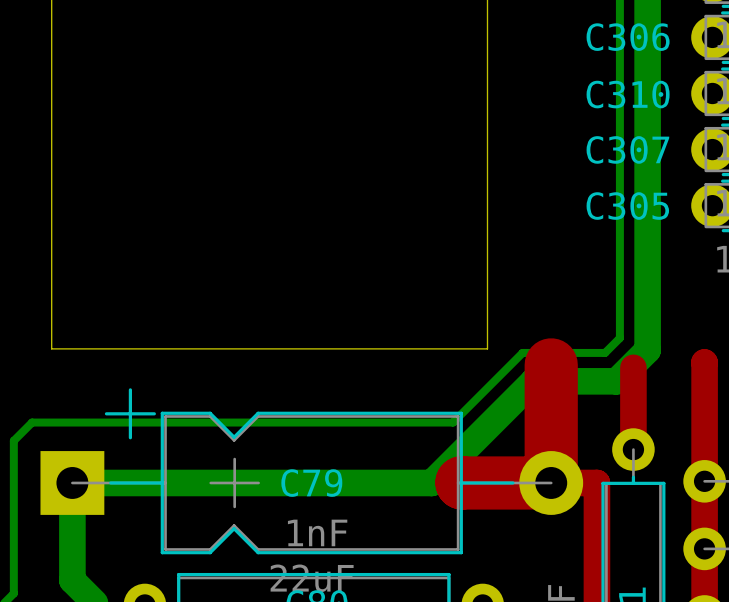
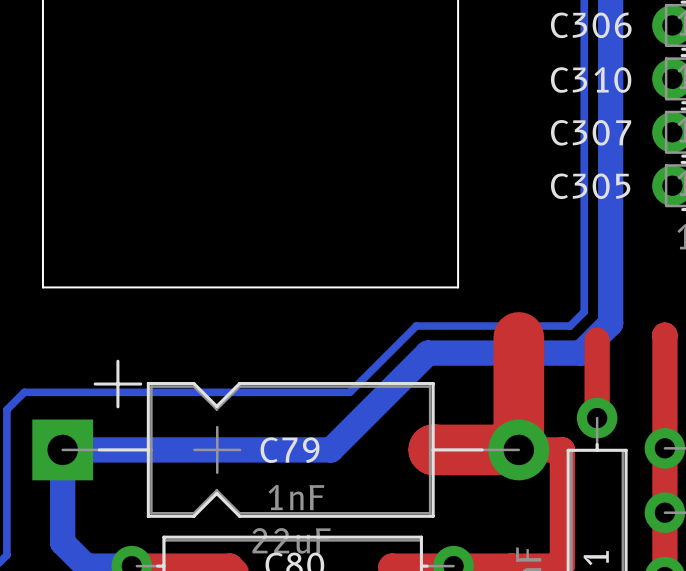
board edge: (51, 312) (51, 348) (487, 348) (487, 312) -> (42, 287) (458, 287)
bottom track: (522, 352) (453, 422) (373, 422) -> (491, 326) (416, 326) (349, 392)
bottom track: (533, 381) (431, 482) (354, 482) -> (501, 353) (427, 353) (331, 449)

